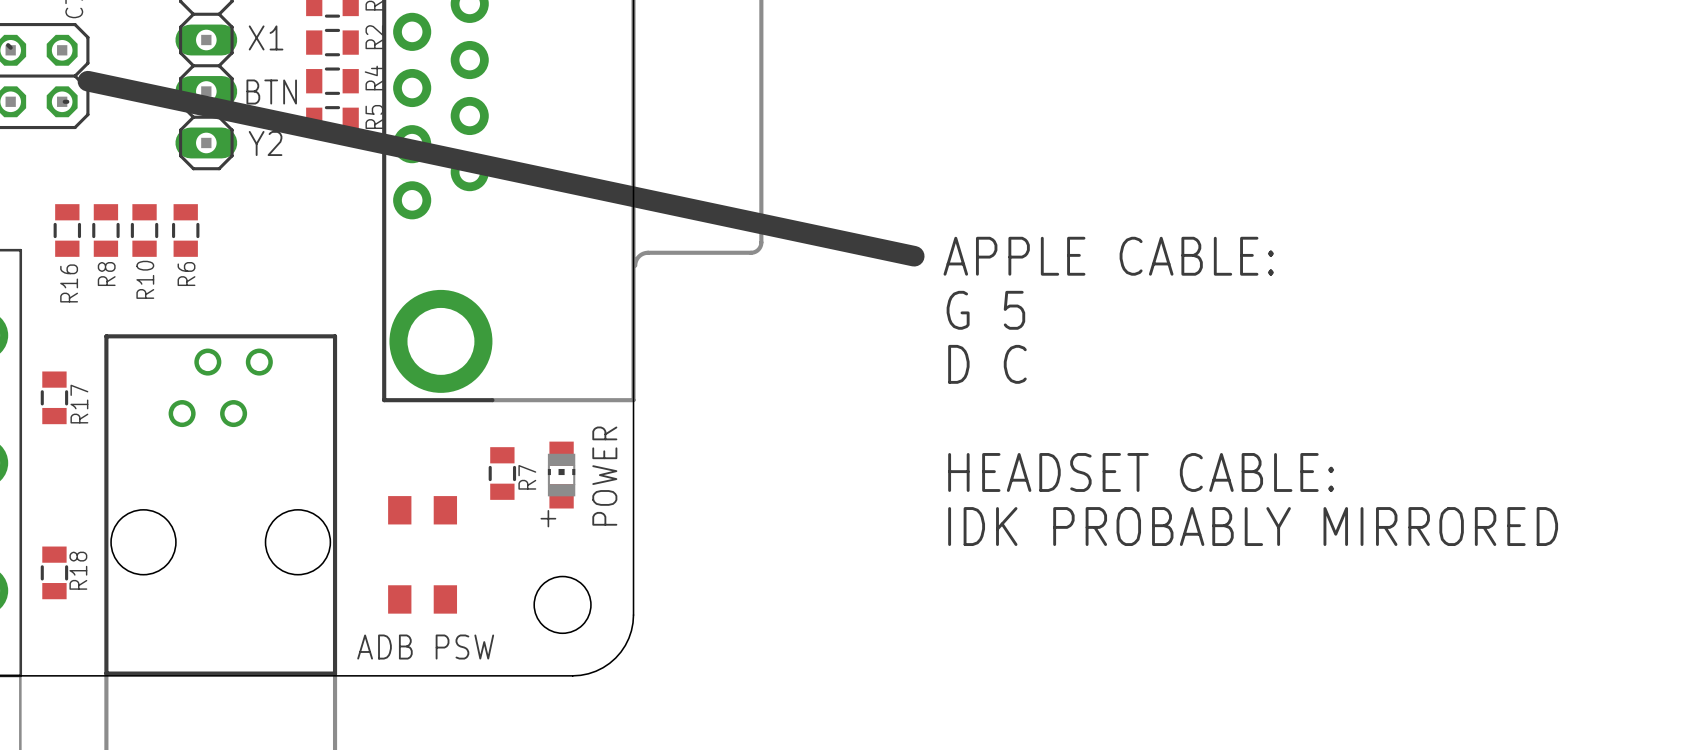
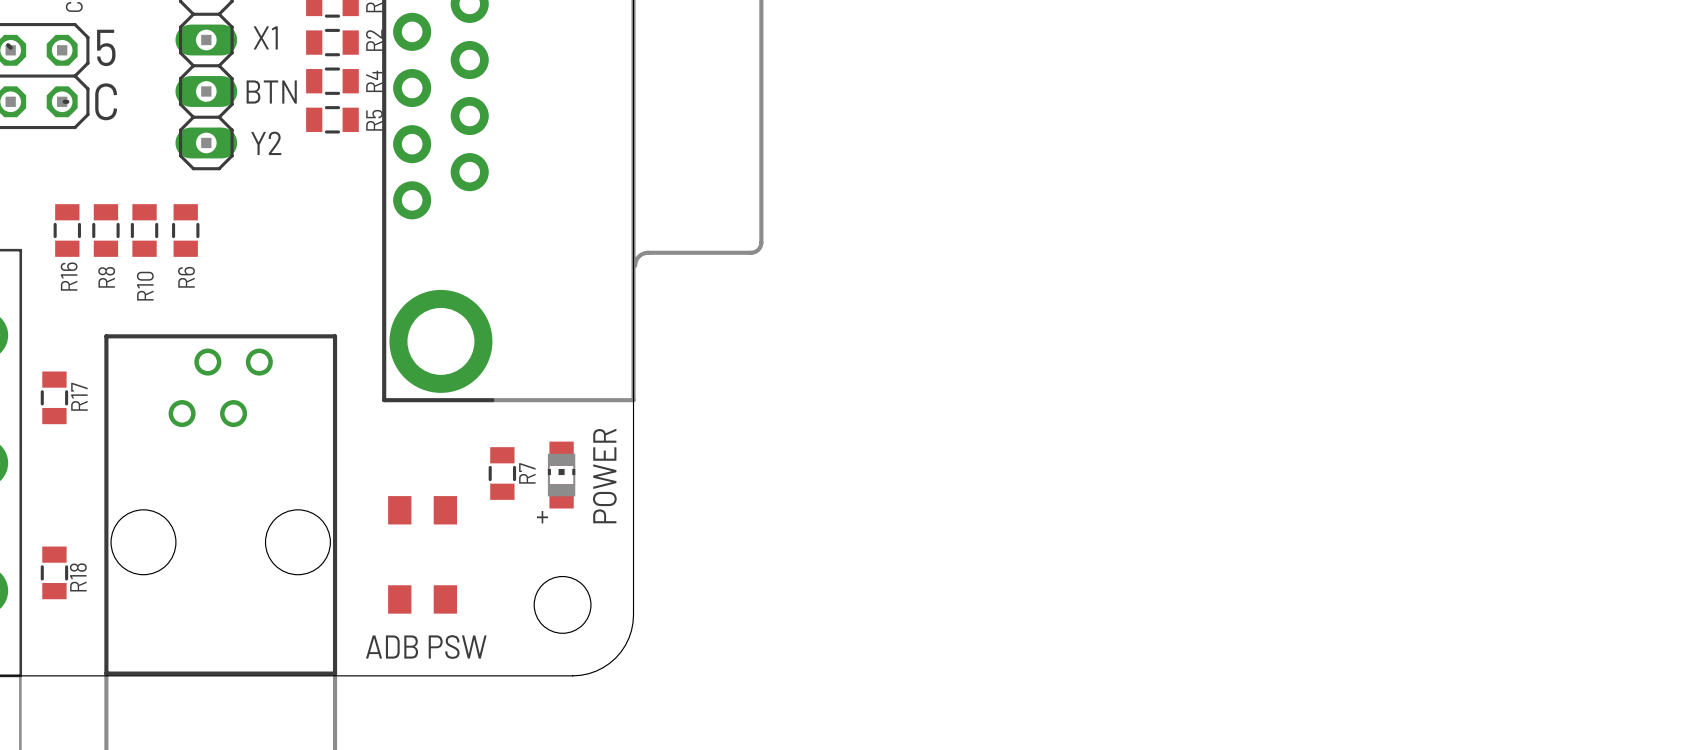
text: none -> 5 (106, 47)
line: (87, 81) (914, 256) -> none
text: none -> C (106, 101)
text: APPLE CABLE: (1108, 256) -> none
text: G 5 (985, 310) -> none
text: D C (987, 364) -> none
text: HEADSET CABLE: (1141, 472) -> none
text: IDK PROBABLY MIRRORED (1253, 526) -> none

